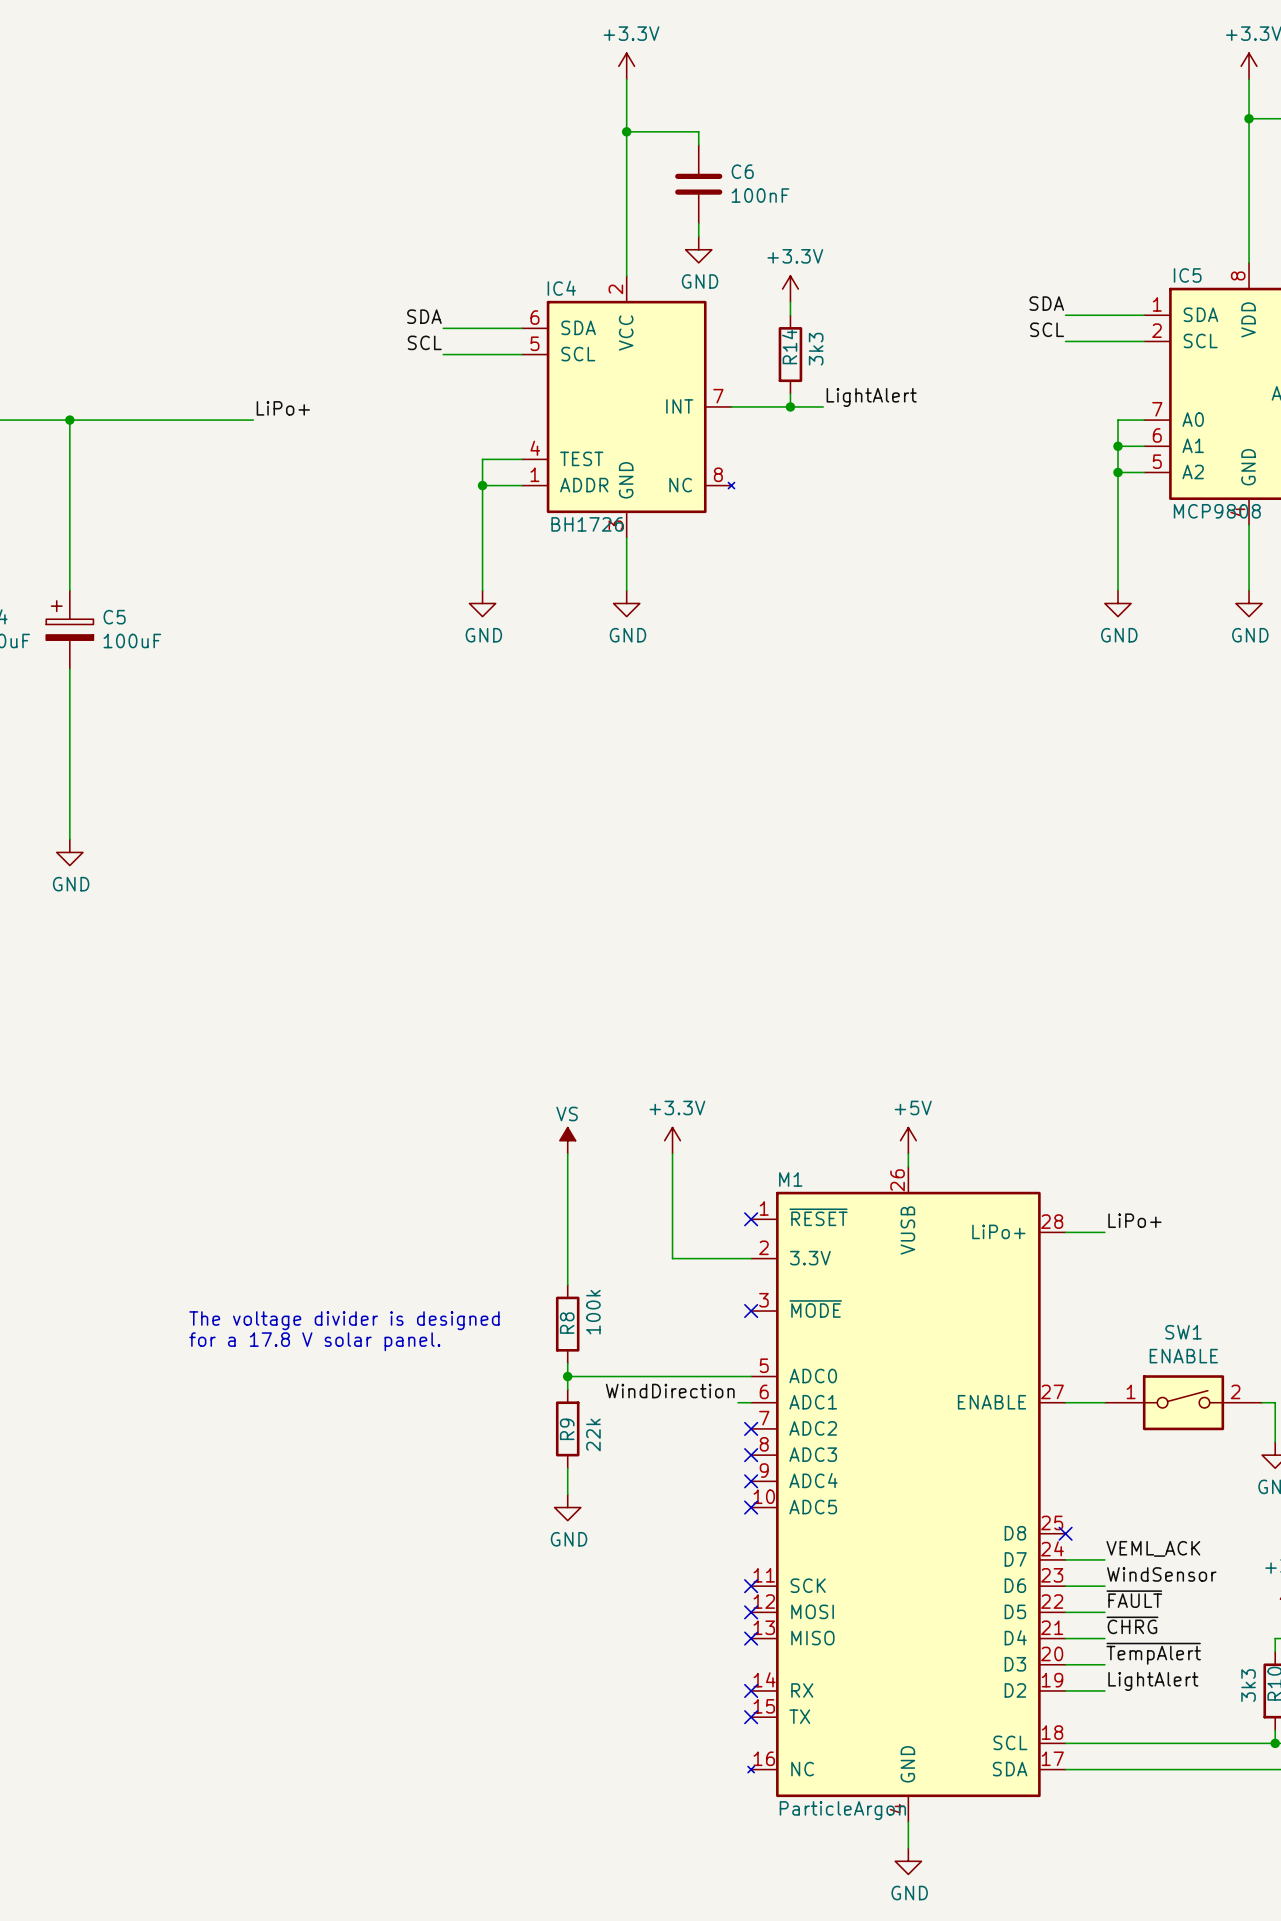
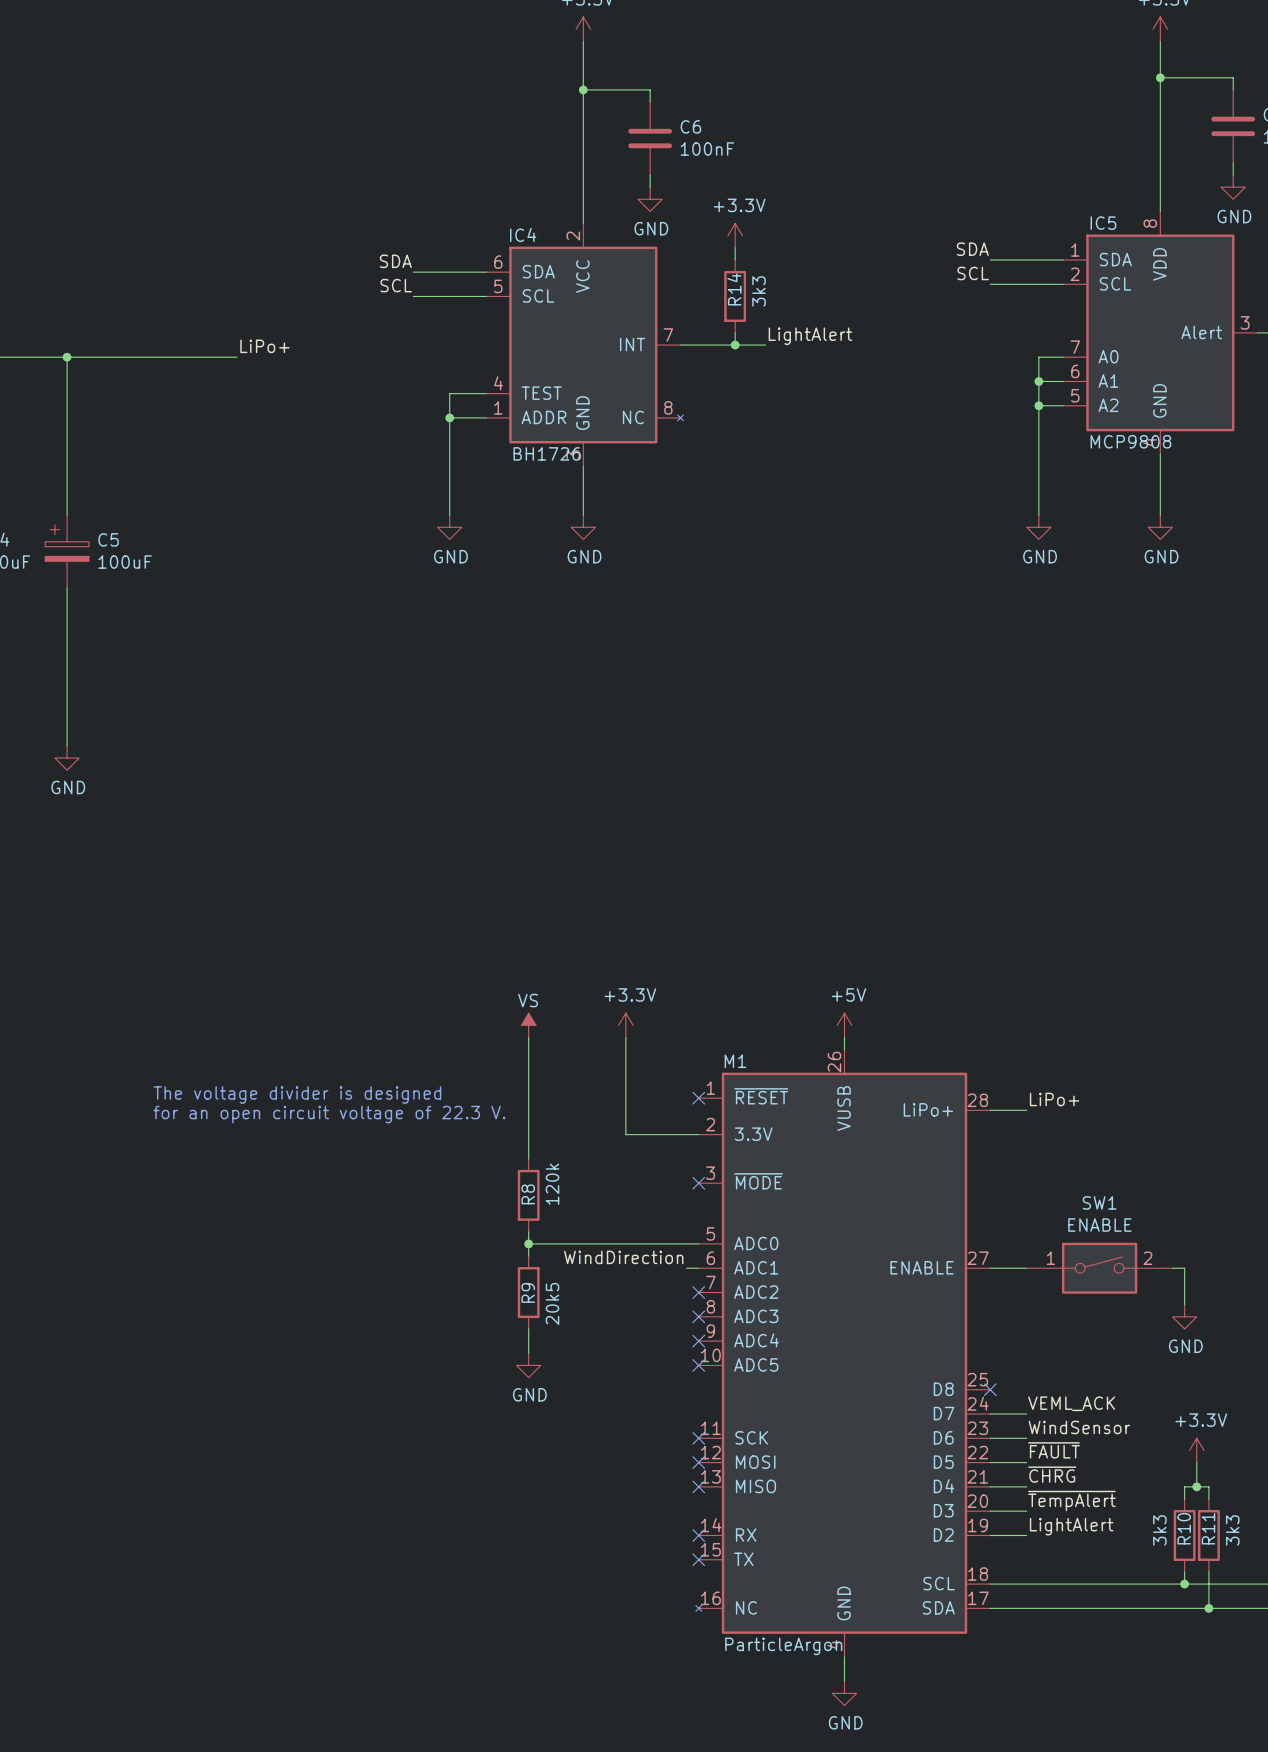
text: none -> for an open circuit voltage of 22.3 V. (329, 1114)
R8 value: 100k (593, 1312) -> 120k (552, 1184)
text position: The voltage divider is designed (344, 1320) -> The voltage divider is designed (297, 1094)
text: for a 17.8 V solar panel. (314, 1341) -> none
R9 value: 22k (593, 1434) -> 20k5 (552, 1303)

